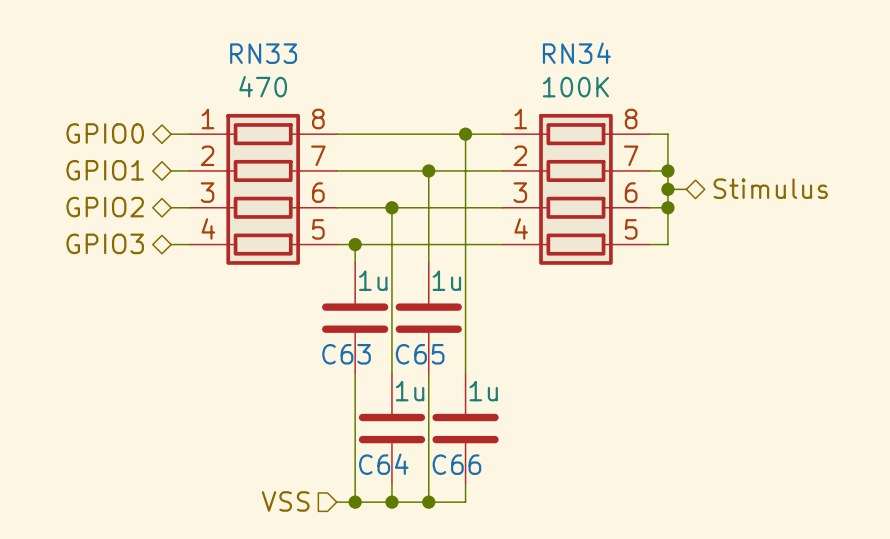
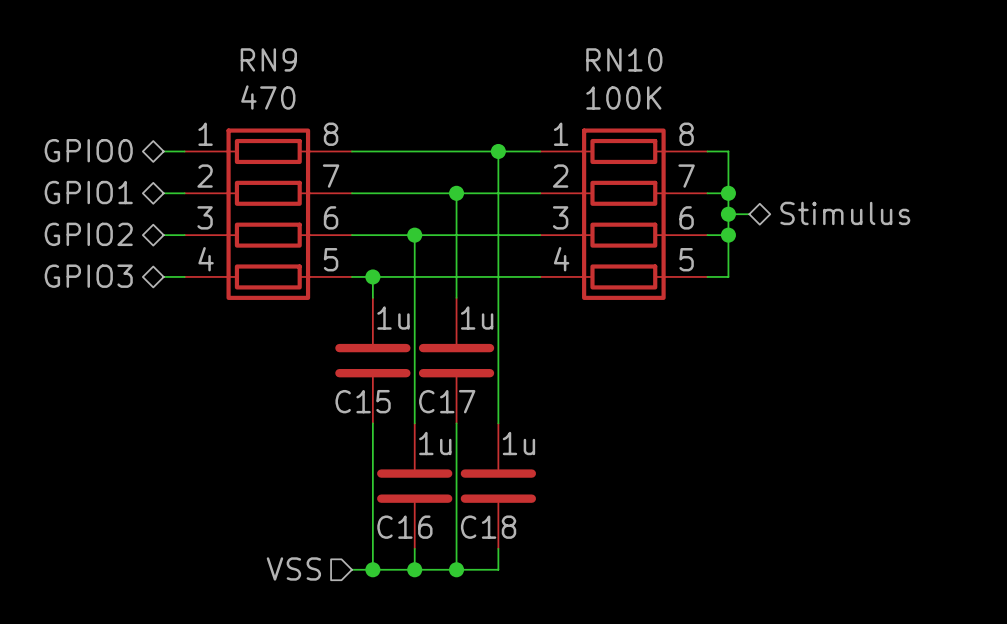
RN33 name: RN33 (263, 53) -> RN9 (268, 59)
RN34 name: RN34 (576, 53) -> RN10 (624, 59)
C63 name: C63 (346, 354) -> C15 (363, 401)
C65 name: C65 (420, 354) -> C17 (447, 401)
C64 name: C64 (383, 464) -> C16 (404, 527)
C66 name: C66 (456, 464) -> C18 (488, 527)

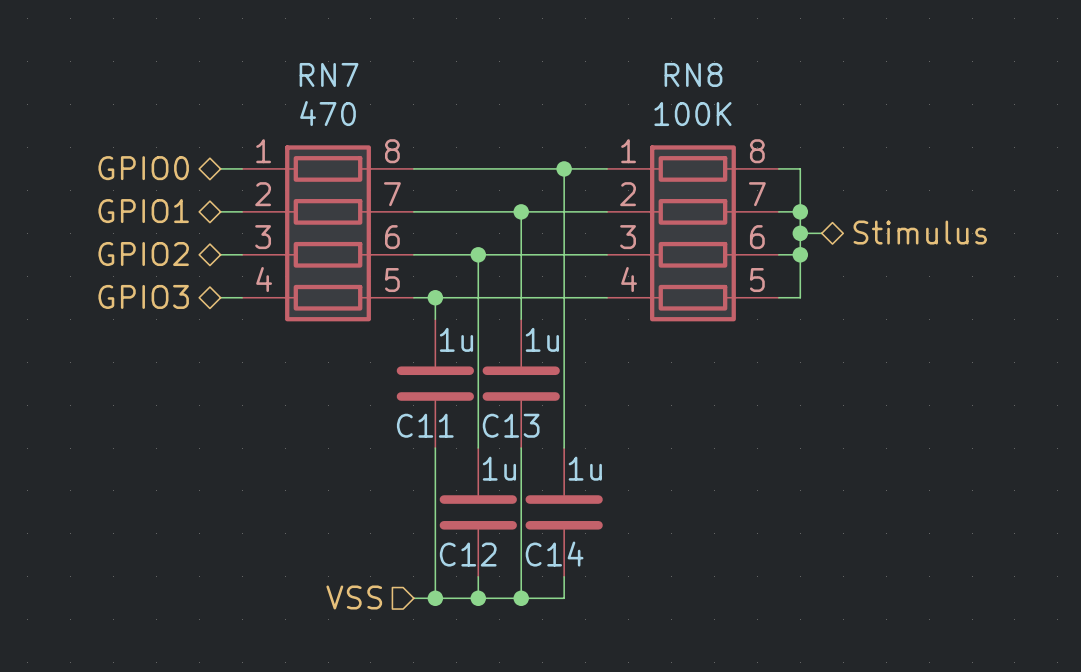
RN9 name: RN9 (268, 59) -> RN7 (329, 74)
RN10 name: RN10 (624, 59) -> RN8 (693, 74)
C15 name: C15 (363, 401) -> C11 (425, 425)
C17 name: C17 (447, 401) -> C13 (511, 425)
C16 name: C16 (404, 527) -> C12 (468, 554)
C18 name: C18 (488, 527) -> C14 (554, 554)

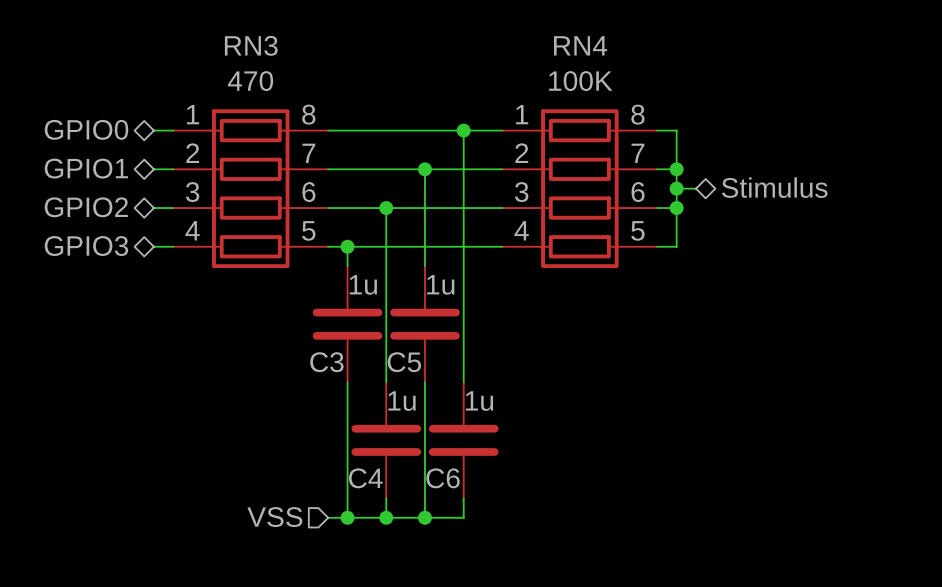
RN7 name: RN7 (329, 74) -> RN3 (251, 45)
RN8 name: RN8 (693, 74) -> RN4 (580, 45)
C11 name: C11 (425, 425) -> C3 (326, 362)
C13 name: C13 (511, 425) -> C5 (404, 362)
C12 name: C12 (468, 554) -> C4 (365, 478)
C14 name: C14 (554, 554) -> C6 (443, 478)

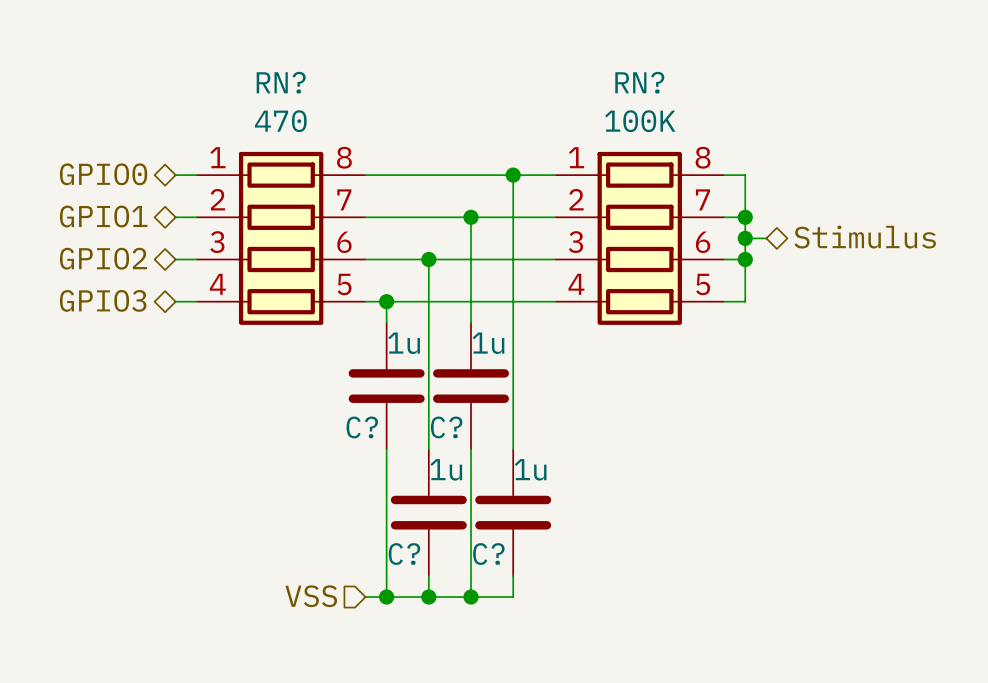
RN3 name: RN3 (251, 45) -> RN? (281, 82)
RN4 name: RN4 (580, 45) -> RN? (639, 82)
C3 name: C3 (326, 362) -> C? (362, 427)
C5 name: C5 (404, 362) -> C? (446, 427)
C4 name: C4 (365, 478) -> C? (404, 554)
C6 name: C6 (443, 478) -> C? (488, 554)

